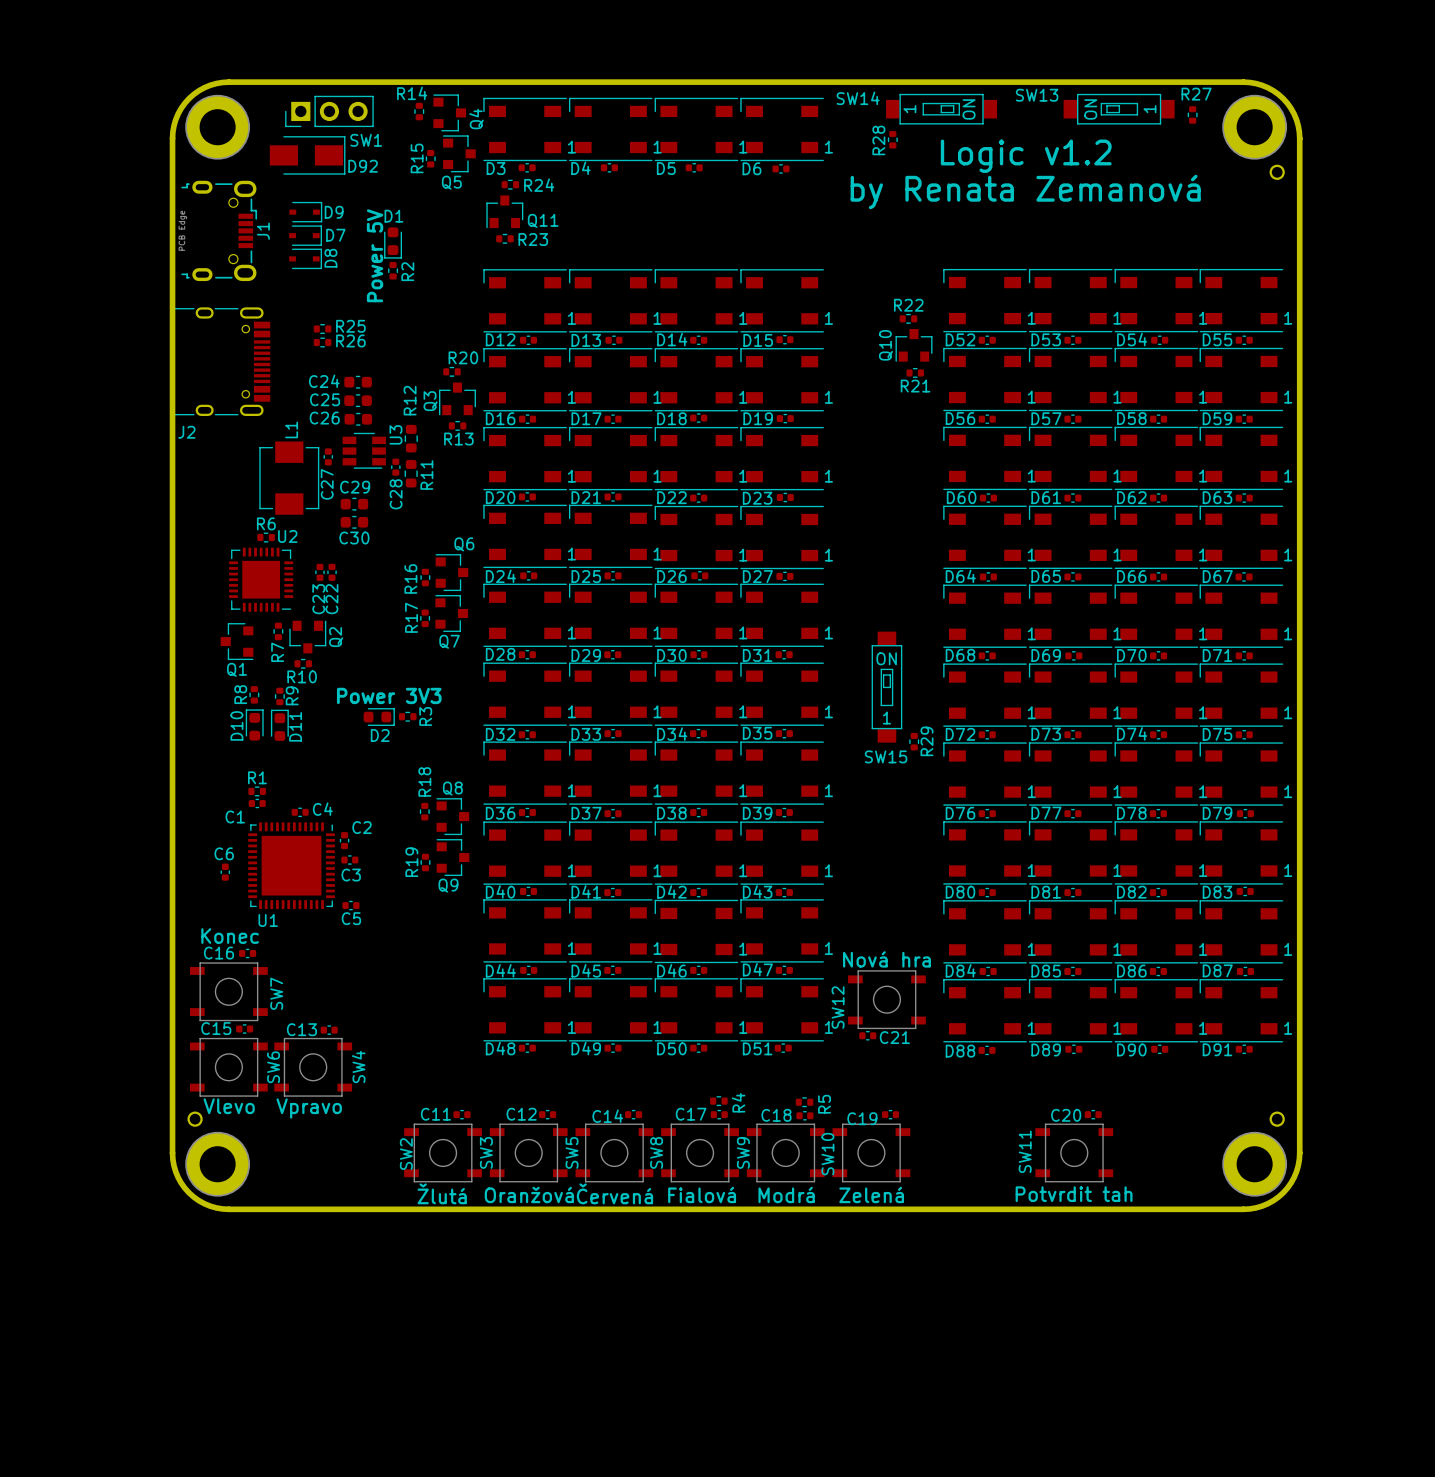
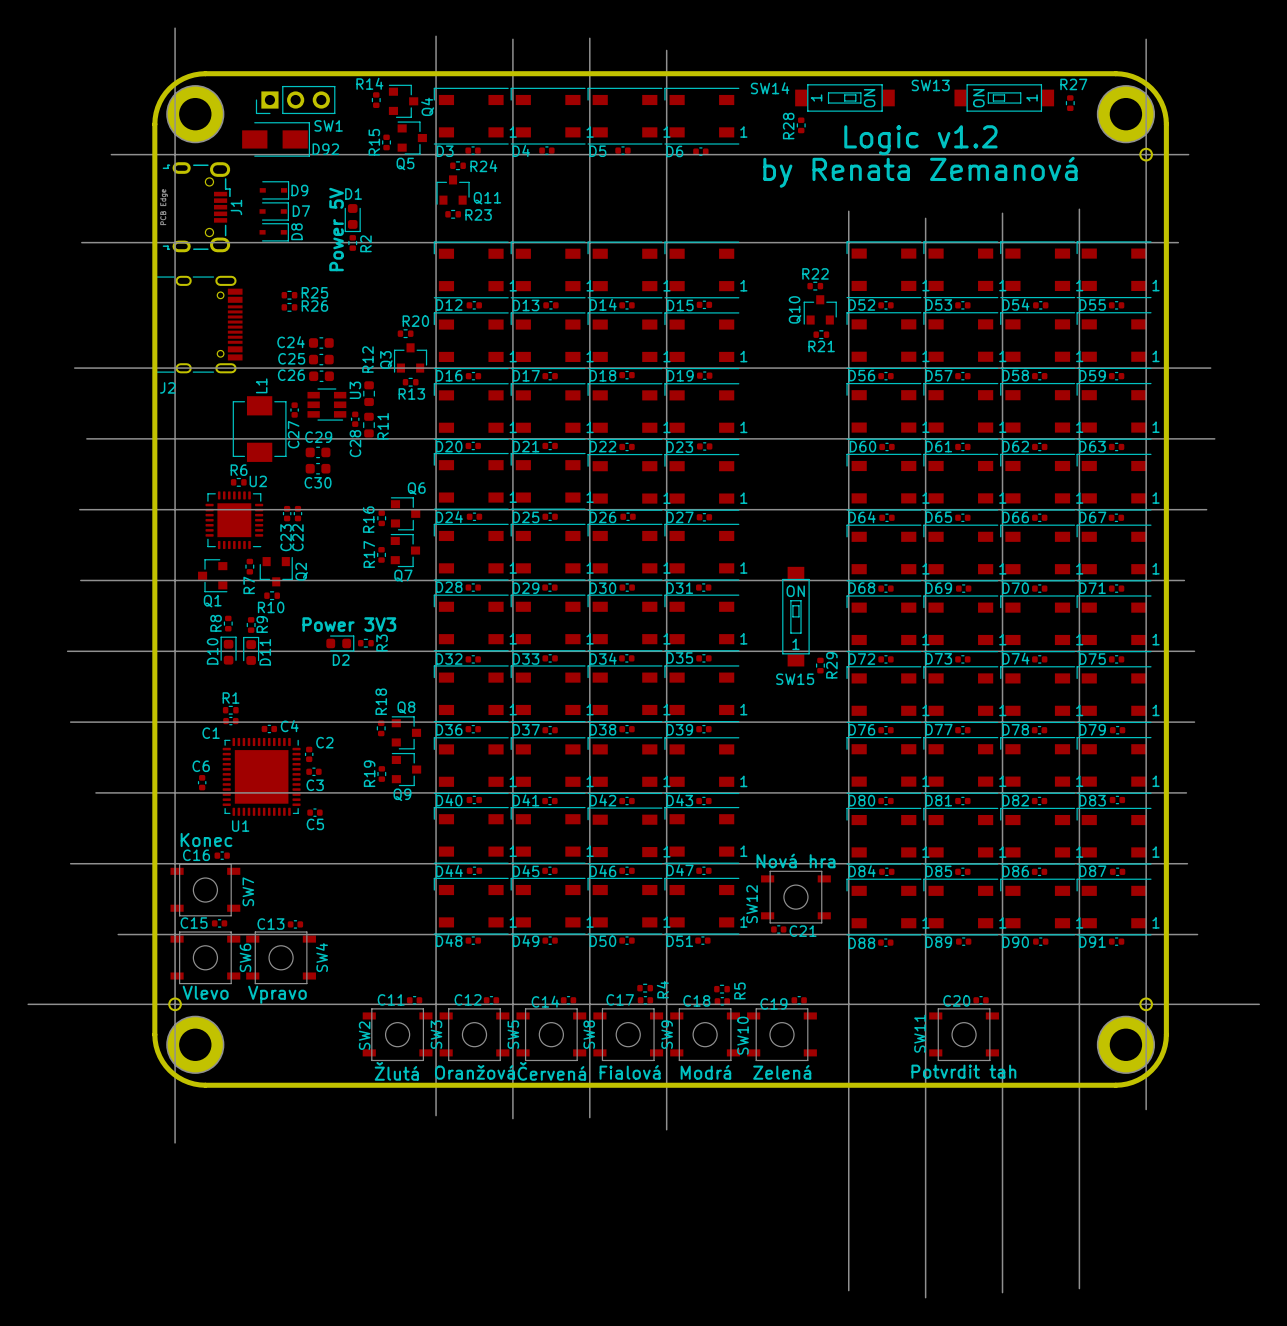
line: none -> (175, 28) (175, 1142)
line: none -> (436, 36) (436, 1115)
line: none -> (589, 38) (589, 1117)
line: none -> (512, 39) (512, 1118)
line: none -> (1146, 39) (1146, 1109)
line: none -> (666, 50) (666, 1129)
line: none -> (111, 154) (1188, 154)
line: none -> (1079, 209) (1079, 1288)
line: none -> (848, 211) (848, 1290)
line: none -> (1002, 213) (1002, 1292)
line: none -> (925, 218) (925, 1297)
line: none -> (81, 242) (1178, 242)
line: none -> (74, 368) (1210, 368)
line: none -> (86, 438) (1214, 438)
line: none -> (79, 509) (1206, 509)
line: none -> (80, 580) (1184, 580)
line: none -> (67, 651) (1194, 651)
line: none -> (70, 722) (1194, 722)
line: none -> (95, 792) (1186, 792)
line: none -> (70, 863) (1187, 863)
line: none -> (118, 934) (1197, 934)
line: none -> (28, 1004) (1259, 1004)

